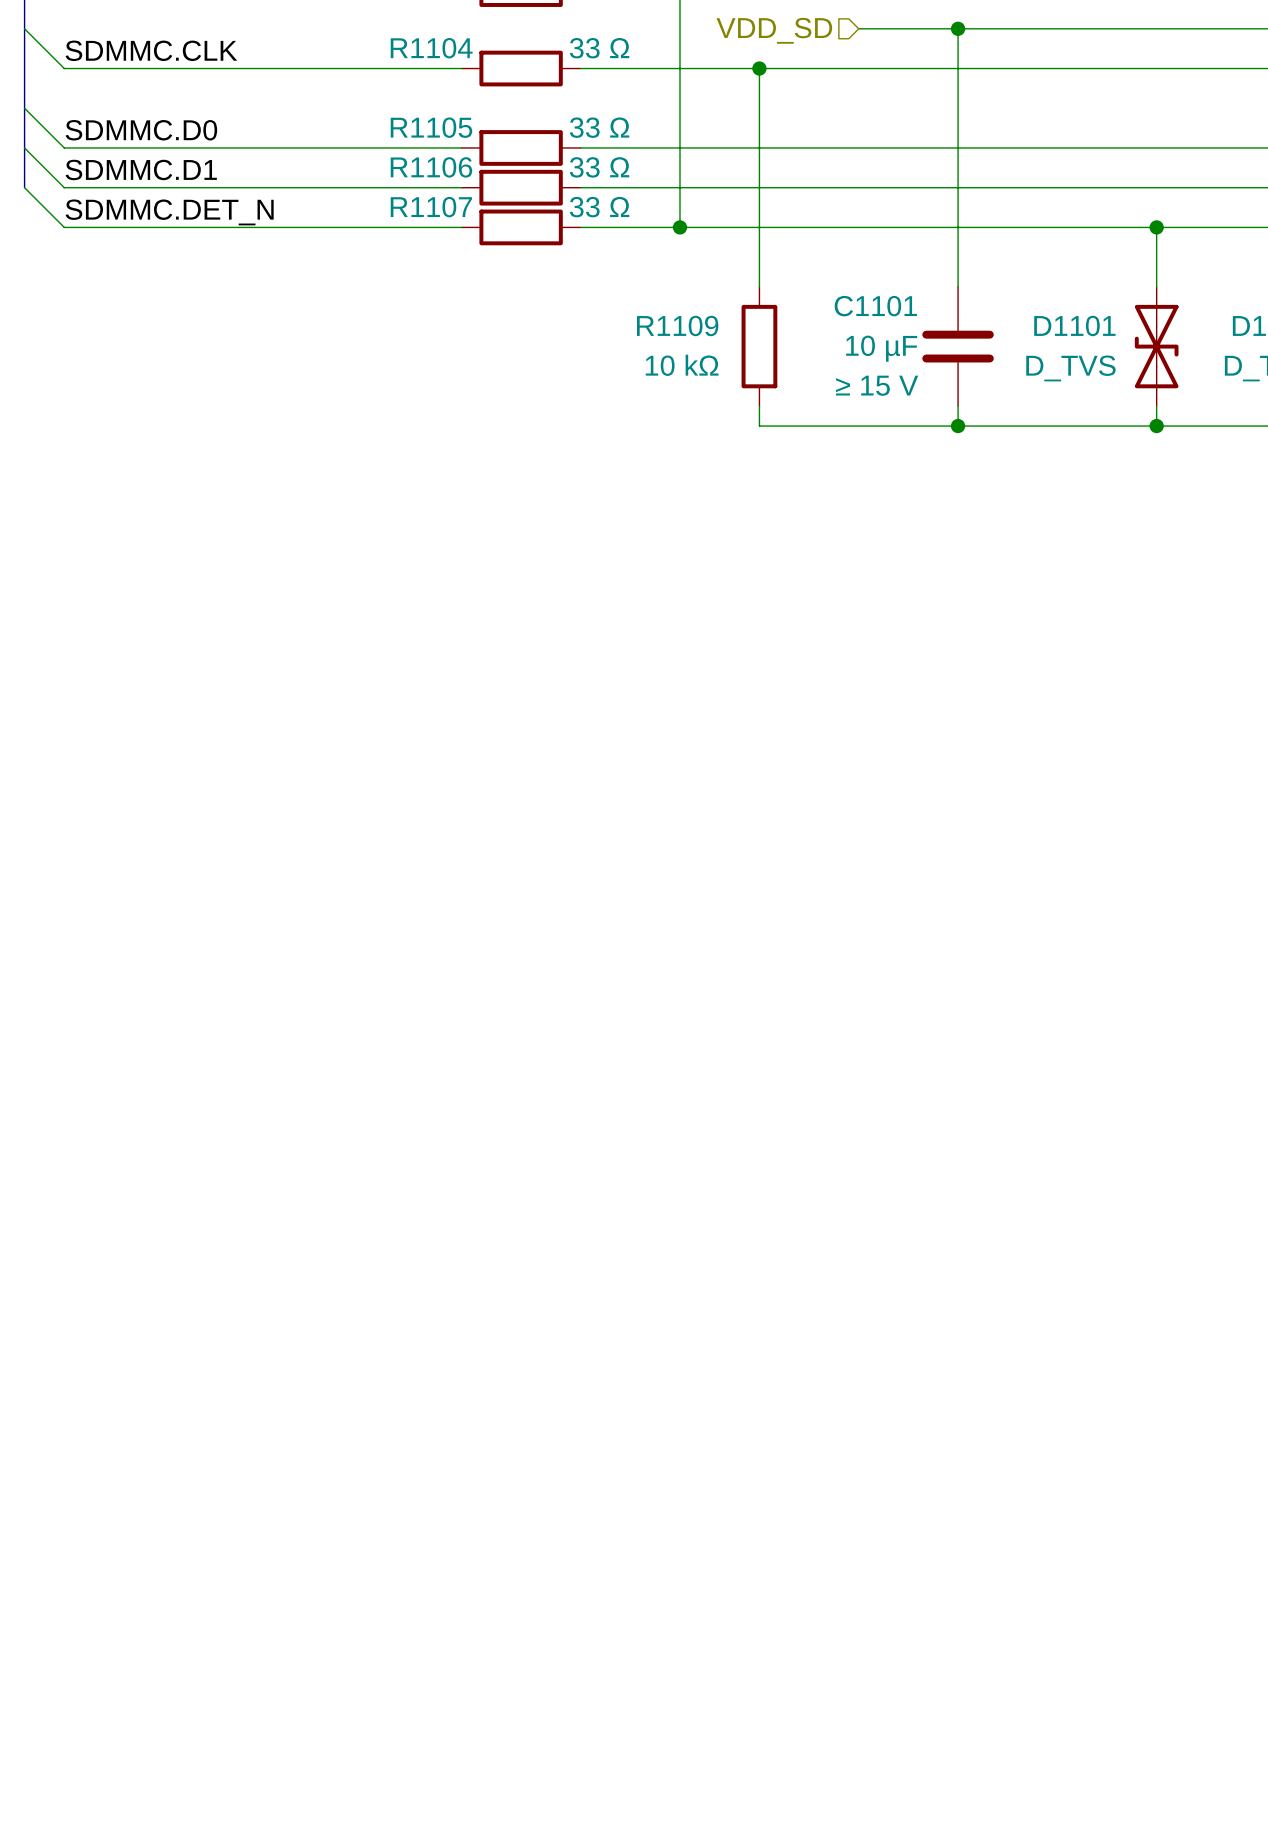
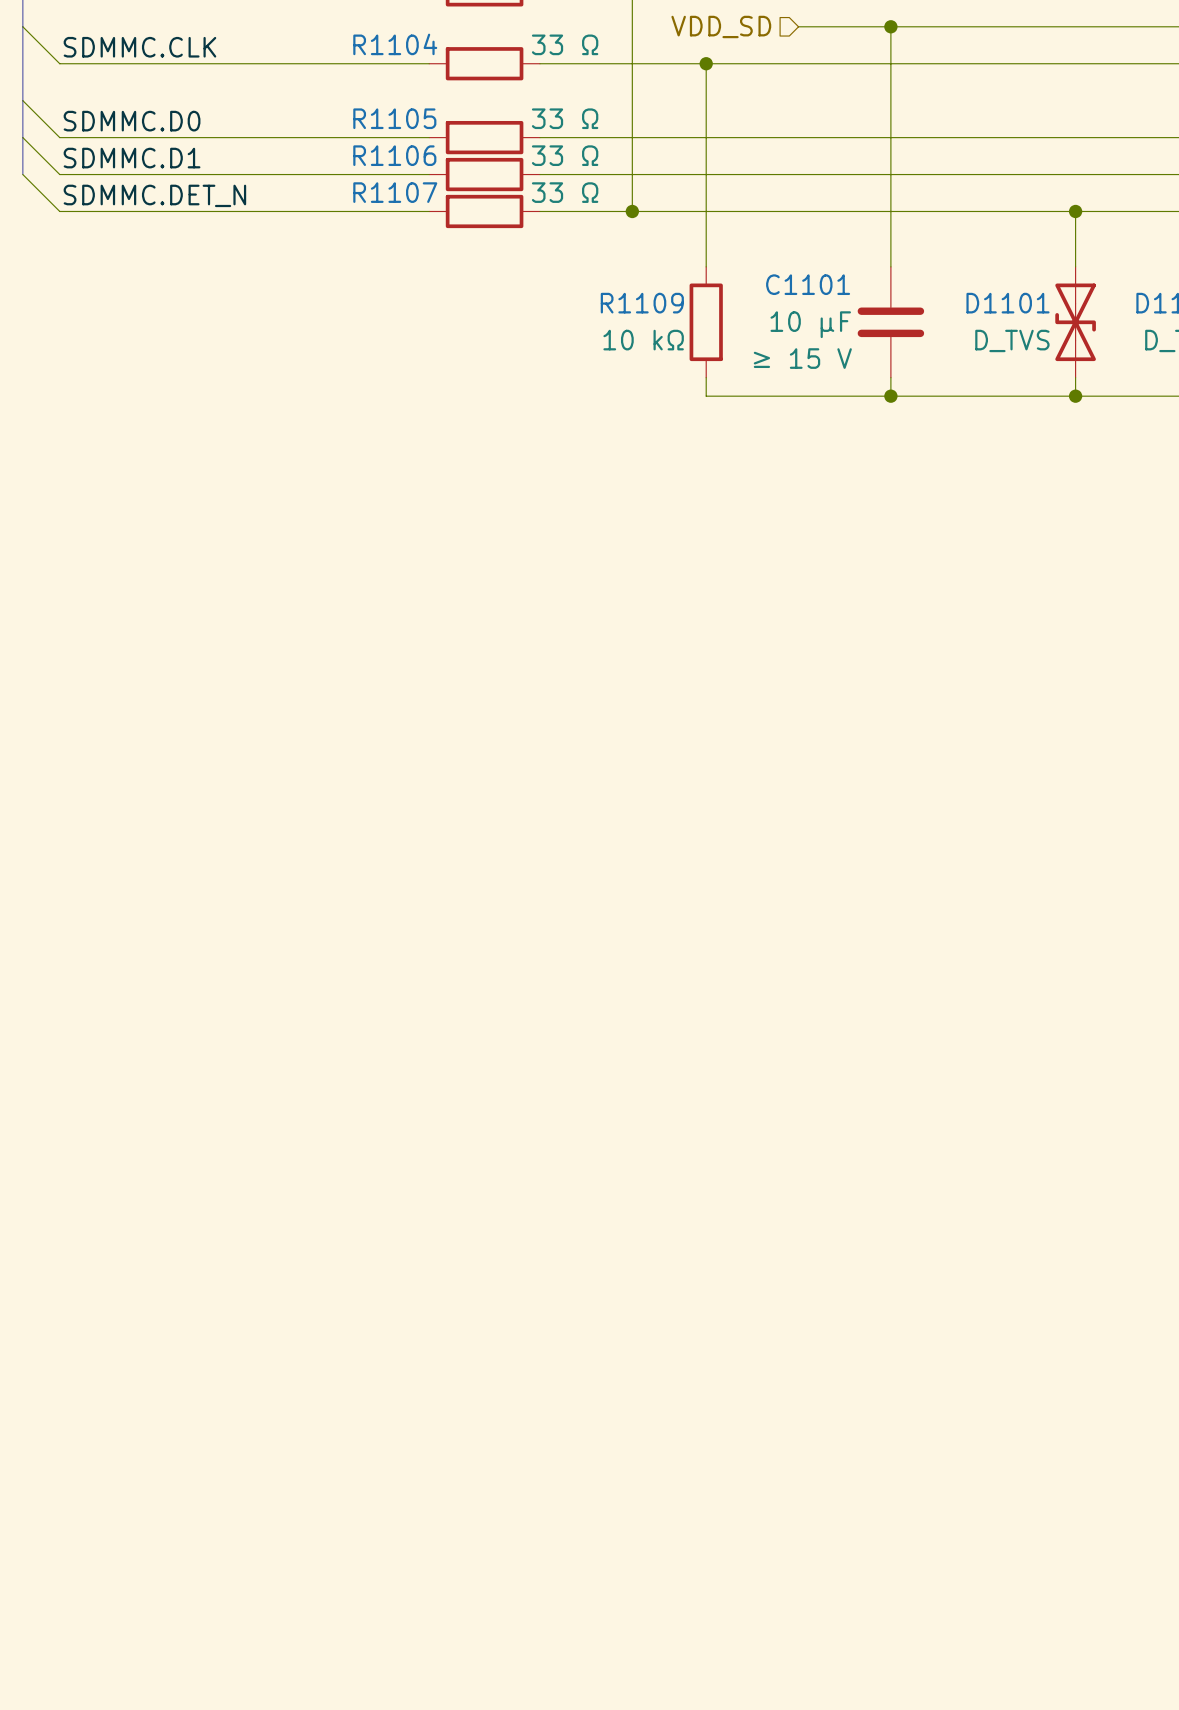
R1109 name position: R1109 (677, 325) -> R1109 (642, 303)
D1101 name position: D1101 (1074, 325) -> D1101 (1008, 303)
R1109 value position: 10 kΩ (682, 365) -> 10 kΩ (643, 340)
D1101 value position: D_TVS (1070, 368) -> D_TVS (1012, 340)

